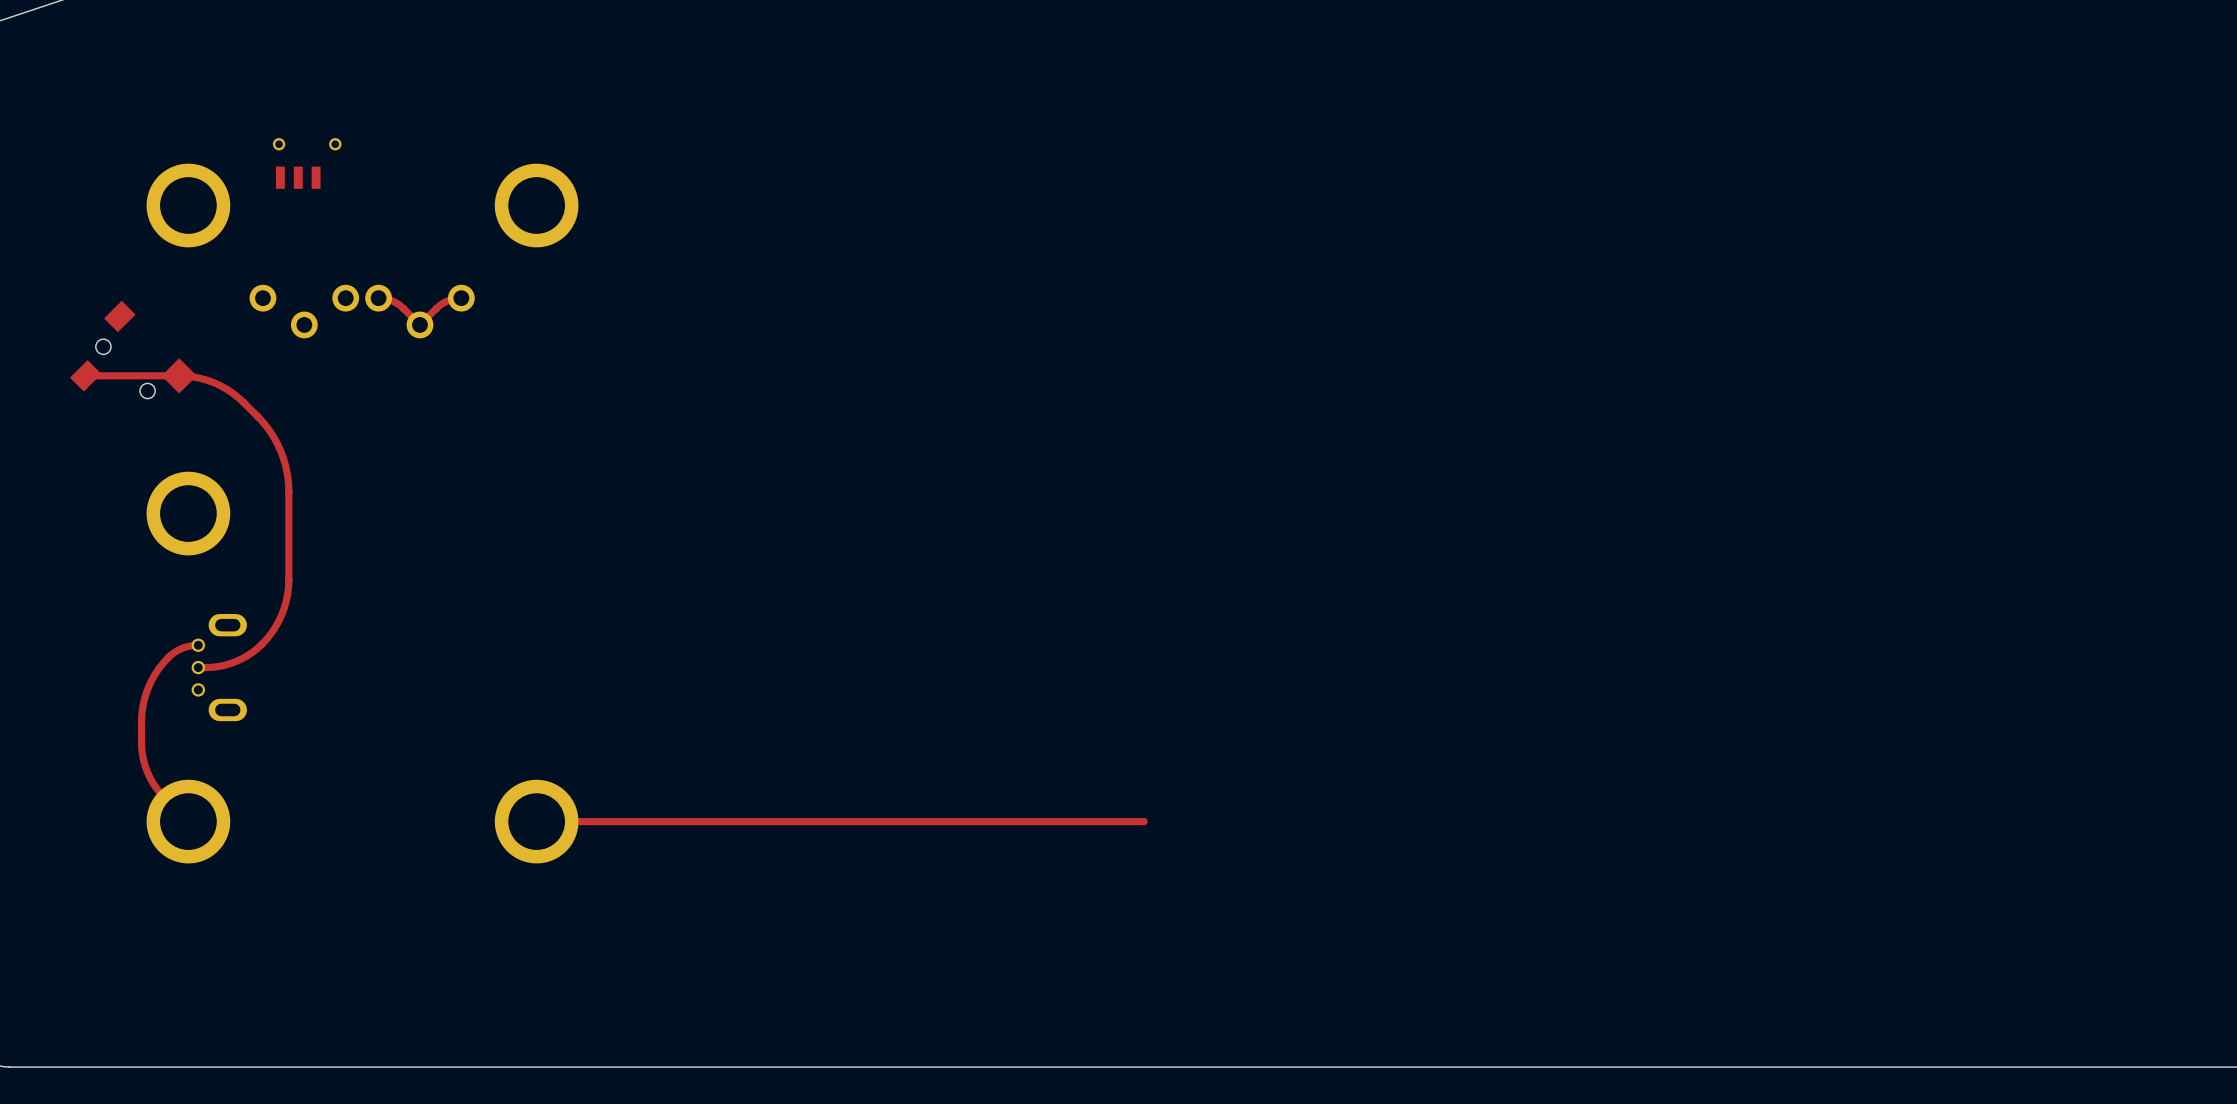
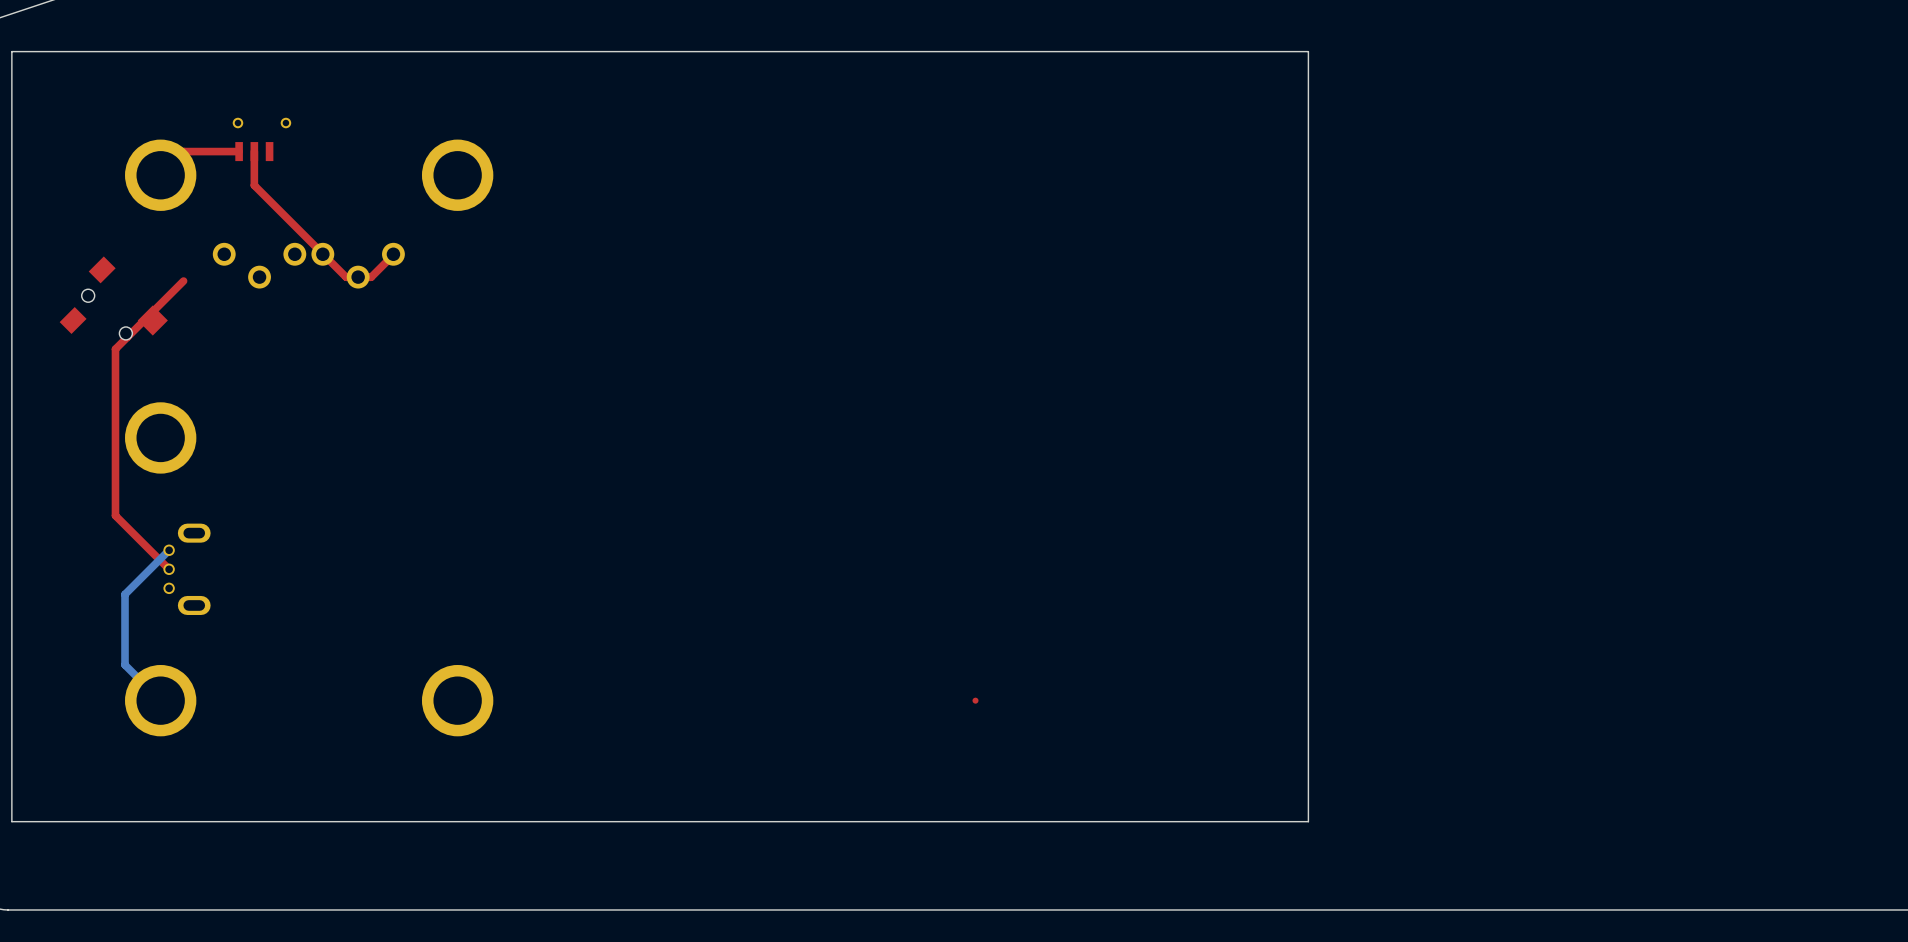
board edge: none -> (1308, 51) (11, 51) (11, 821) (1308, 821) (1308, 51)
top track: none -> (239, 151) (184, 151) (160, 175)
top track: none -> (254, 151) (254, 185) (346, 277) (371, 277) (393, 254)
top track: (461, 298) (451, 299) (441, 304) (419, 324) (398, 304) (388, 299) (378, 298) -> none
top track: (85, 375) (186, 376) (214, 382) (232, 393) (257, 416) (270, 432) (280, 451) (286, 471) (288, 491) (288, 586) (281, 614) (266, 638) (247, 655) (224, 665) (198, 667) -> (183, 281) (115, 349) (115, 515) (169, 569)
top track: (198, 645) (178, 650) (163, 662) (148, 687) (141, 715) (141, 748) (147, 772) (160, 793) (188, 821) -> none
bottom track: none -> (169, 550) (125, 594) (125, 664) (160, 700)
top track: (1143, 821) (536, 821) -> none

